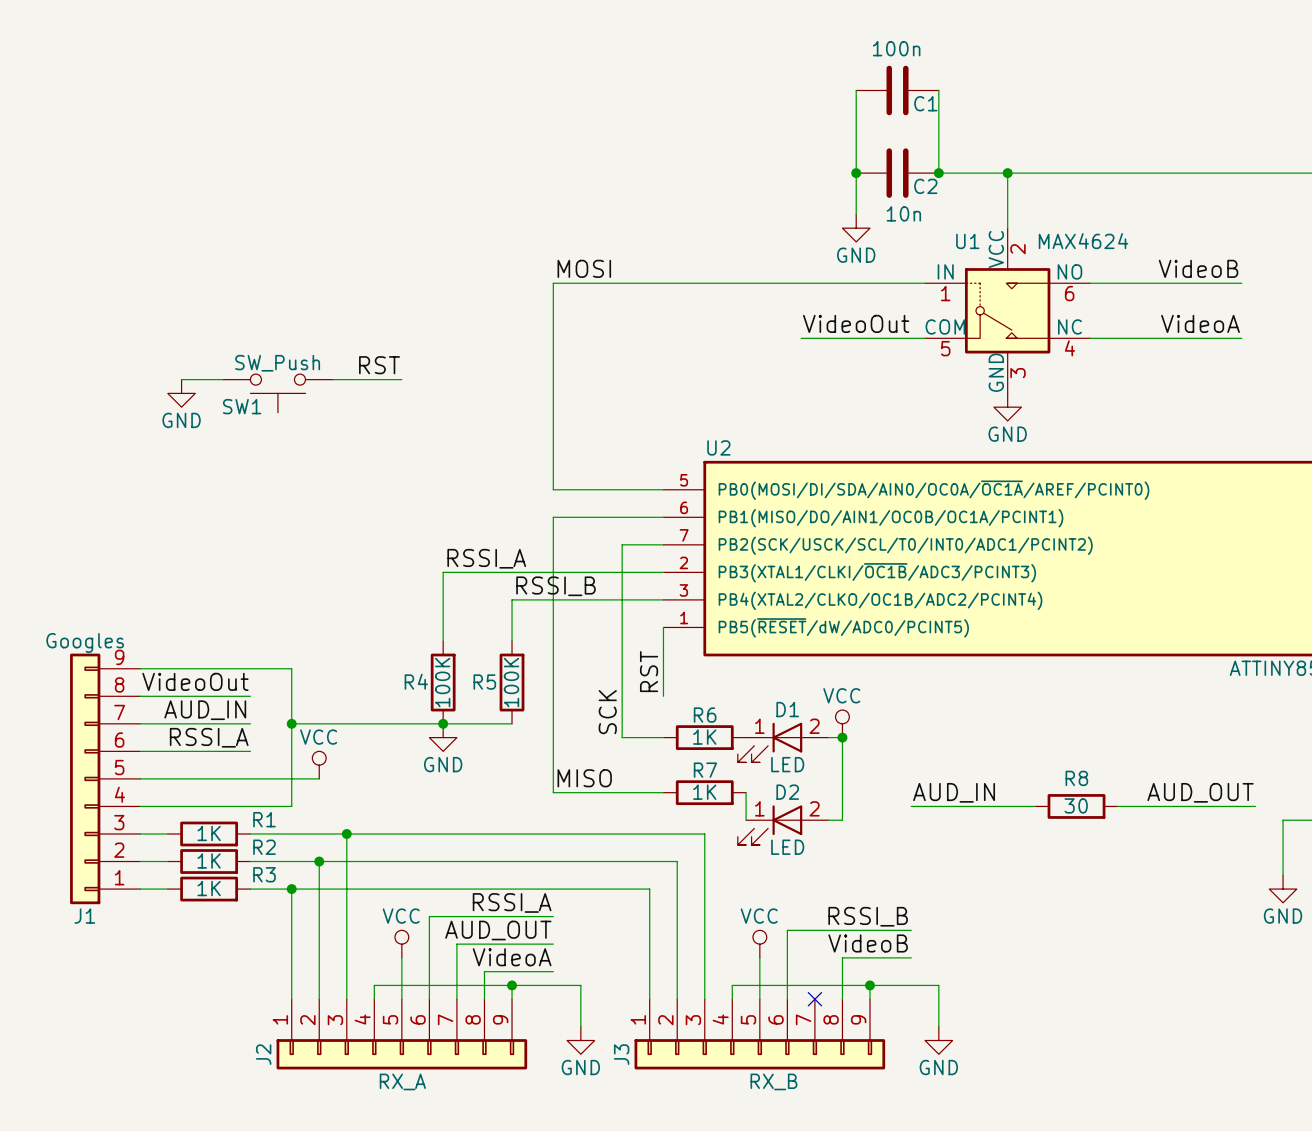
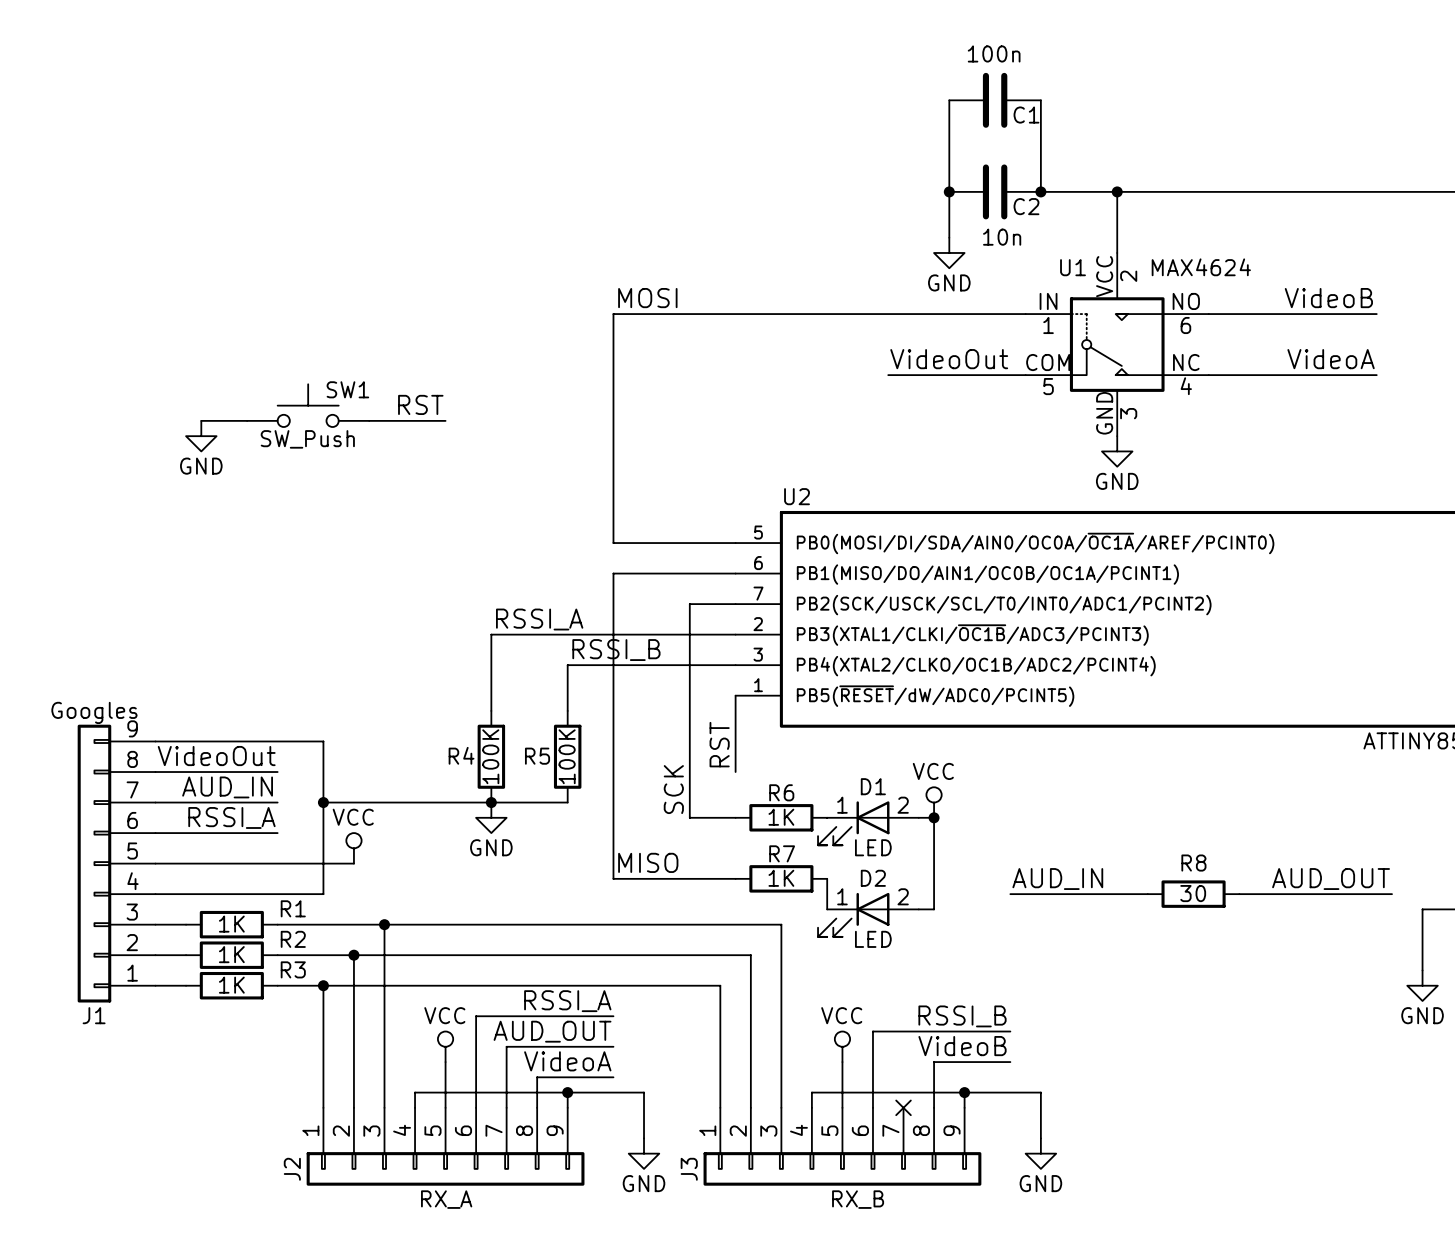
SW1 rotation: 0° (277, 393) -> 180° (308, 405)

